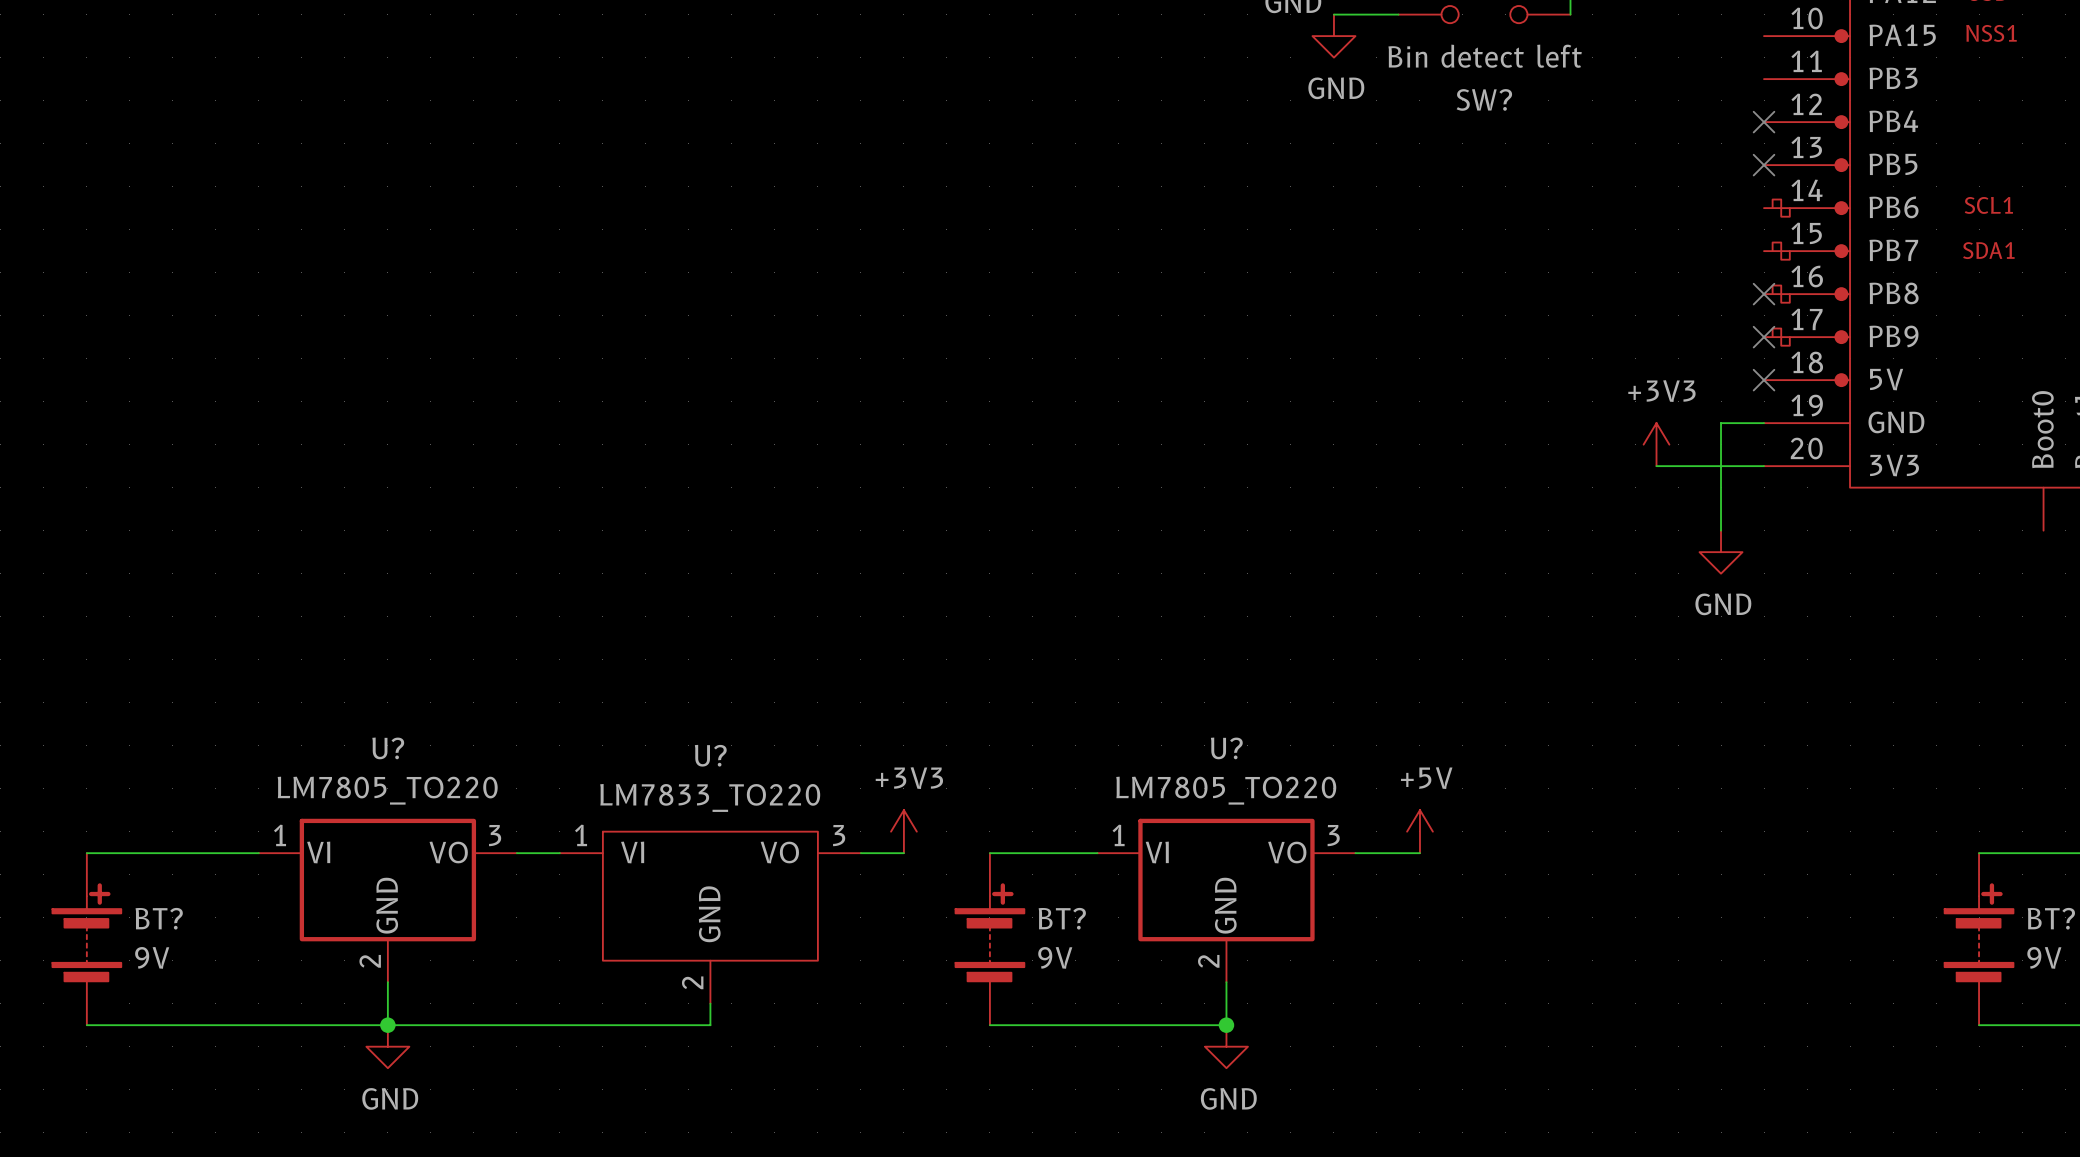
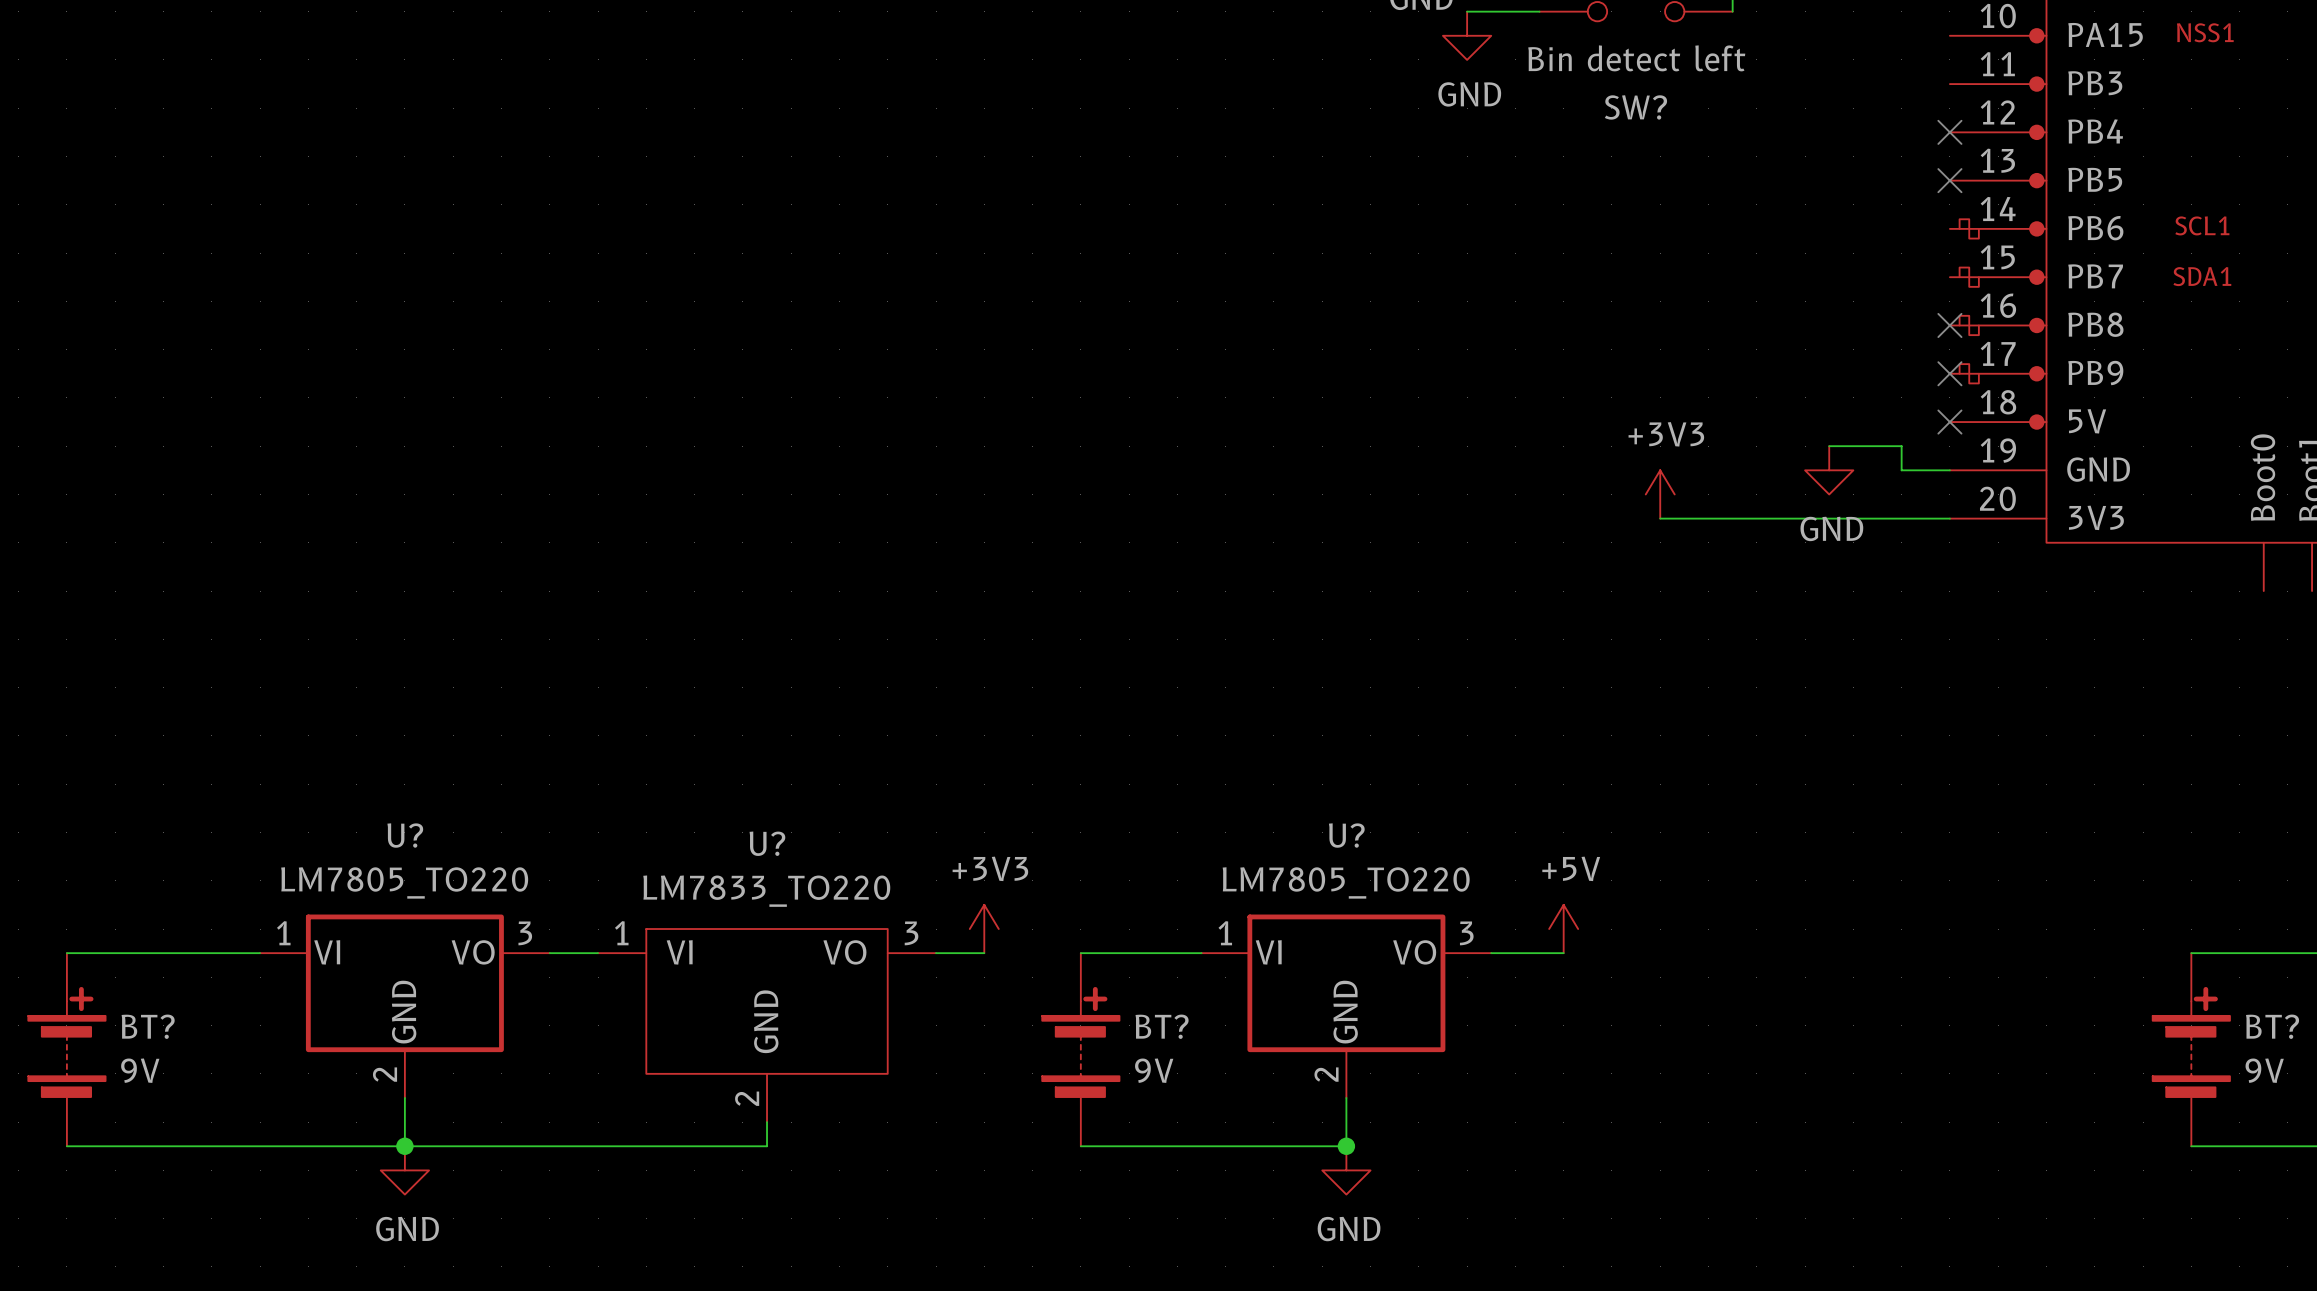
wire: (1721, 423) (1721, 530) -> (1901, 470) (1901, 446) (1829, 446)
power symbol position: +3V3 (1656, 444) -> +3V3 (1660, 494)
wire: none -> (1660, 518) (1829, 518)
power symbol position: GND (1721, 552) -> GND (1829, 470)

